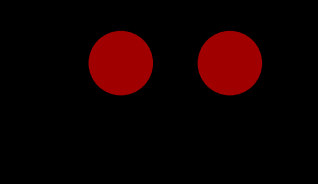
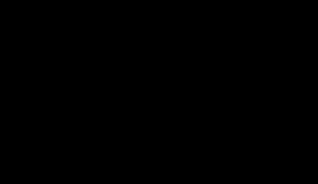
part: (175, 63) -> none

